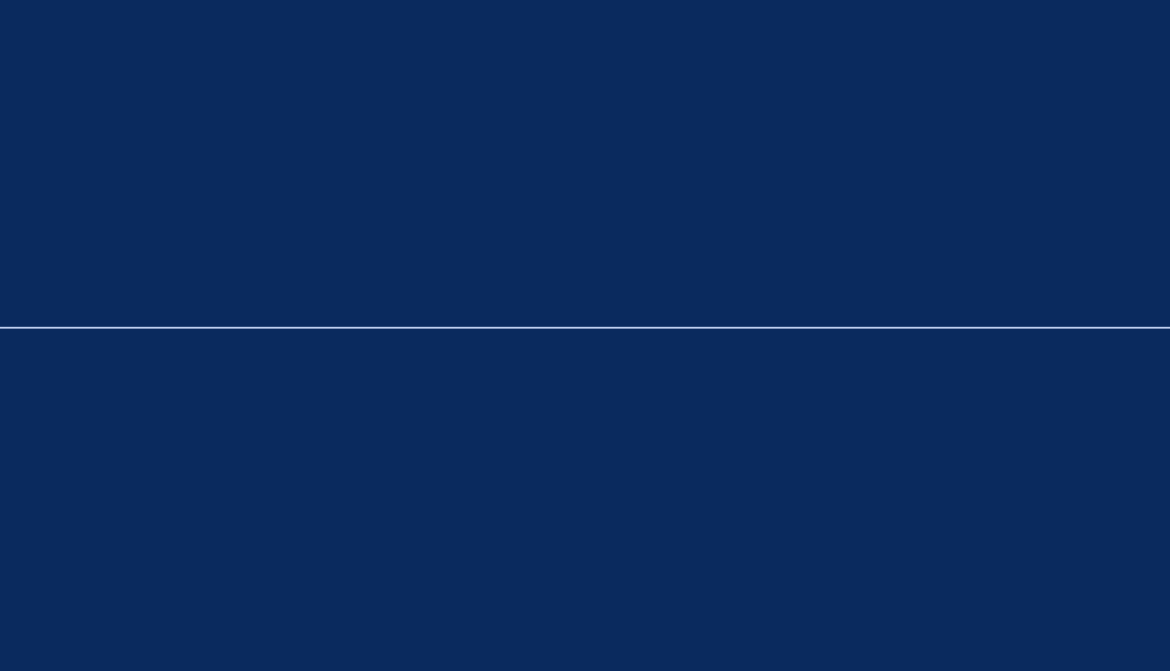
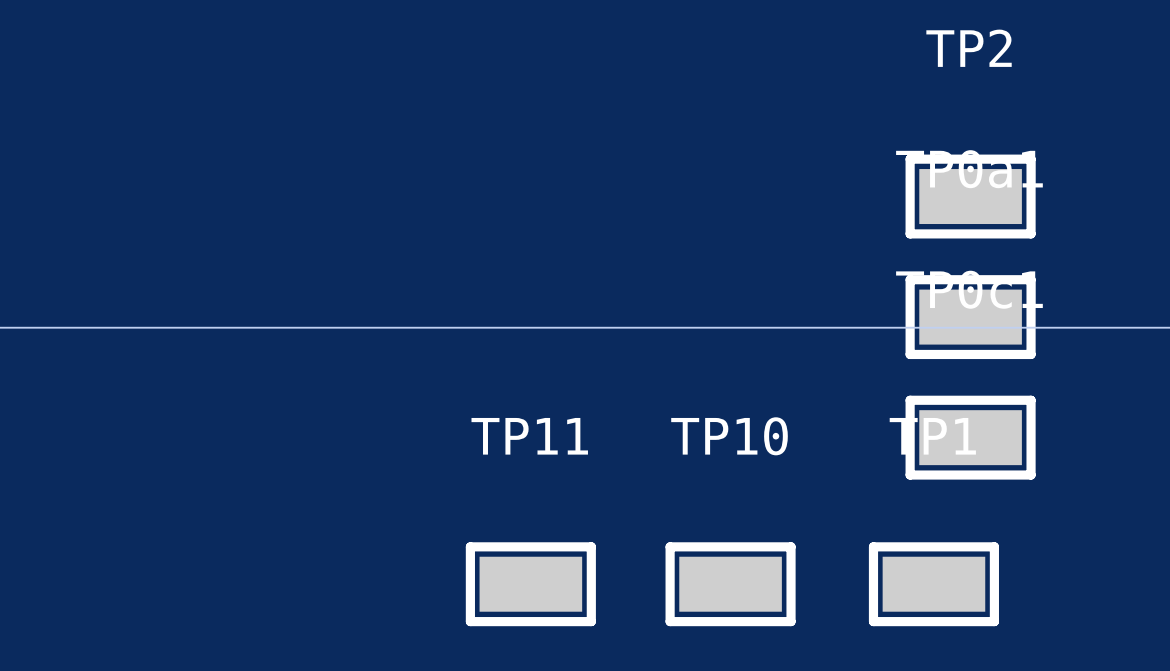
TP2: none -> (970, 196)
part: none -> (970, 317)
part: none -> (970, 437)
TP11: none -> (530, 584)
TP10: none -> (730, 584)
part: none -> (933, 584)

